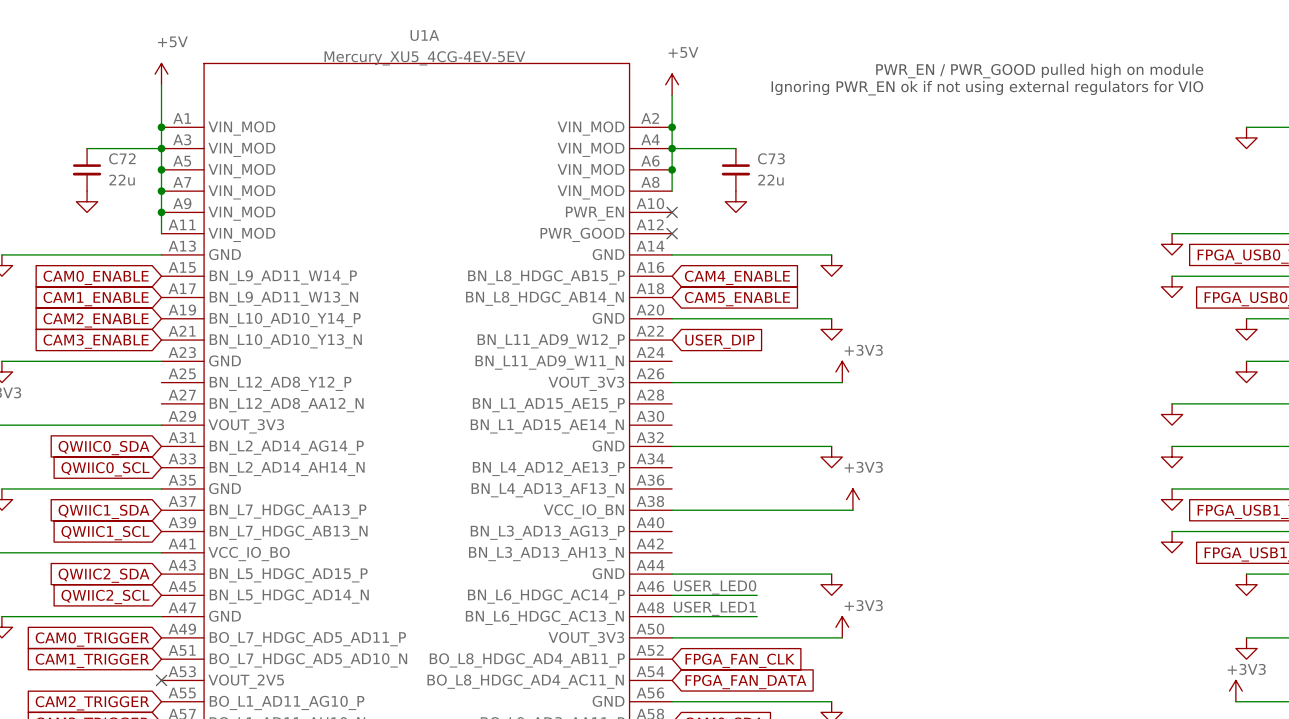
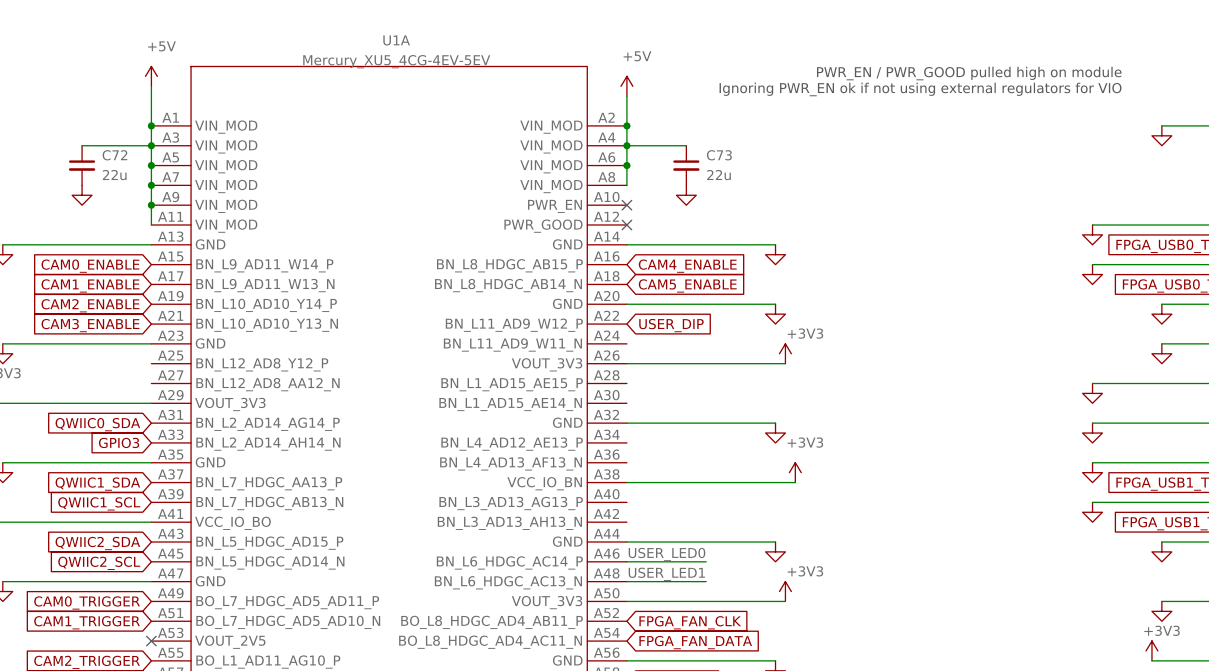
global label: QWIIC0_SCL (105, 469) -> GPIO3 (119, 442)

